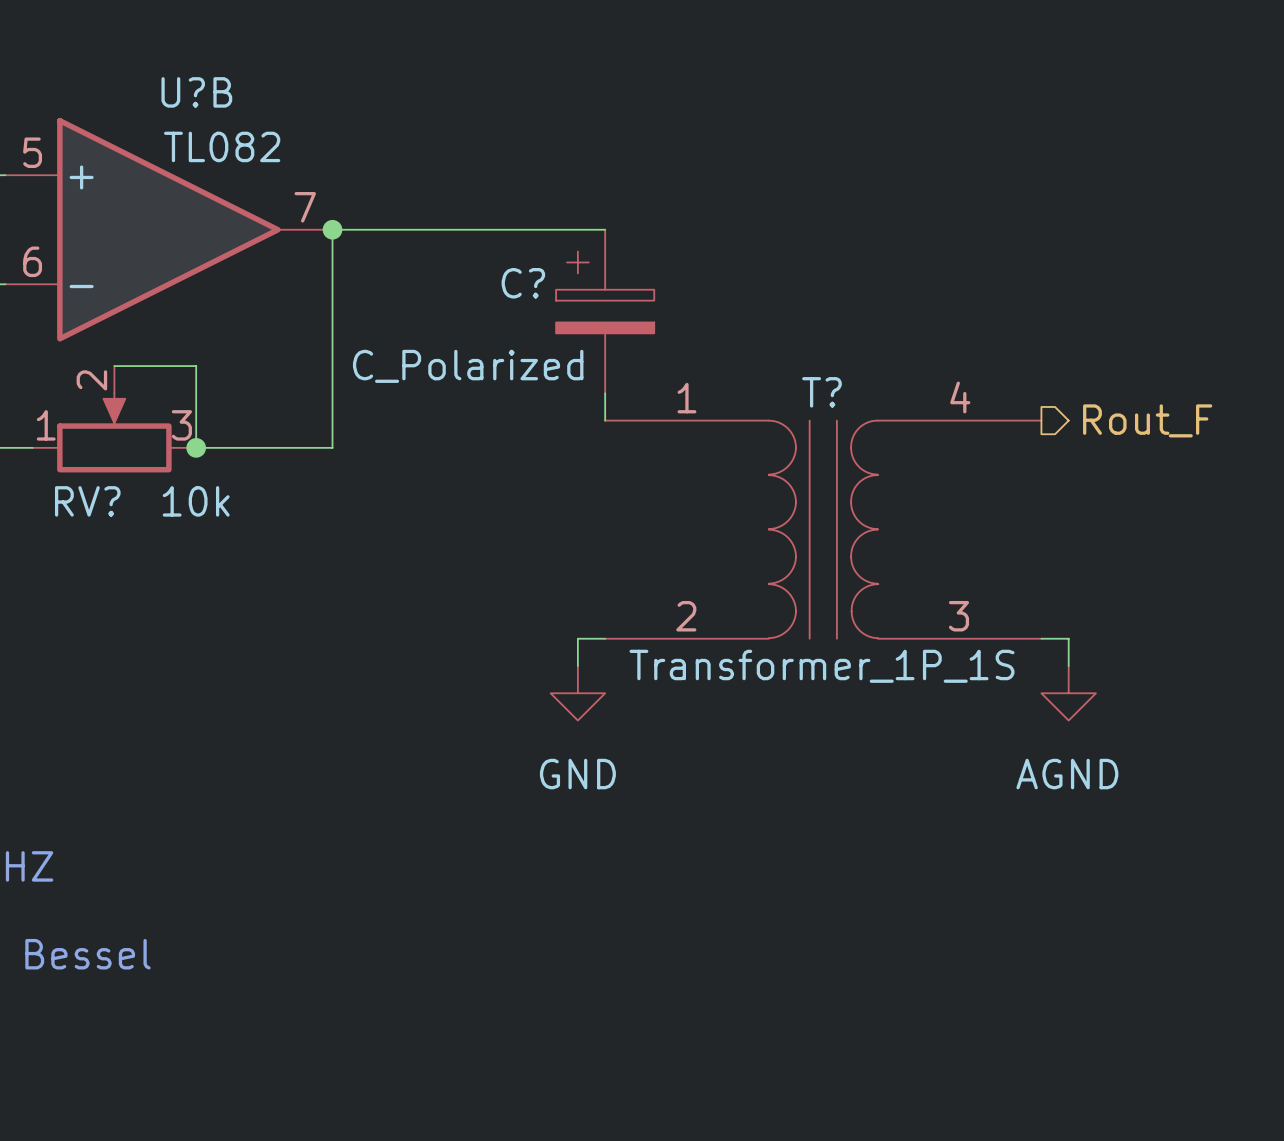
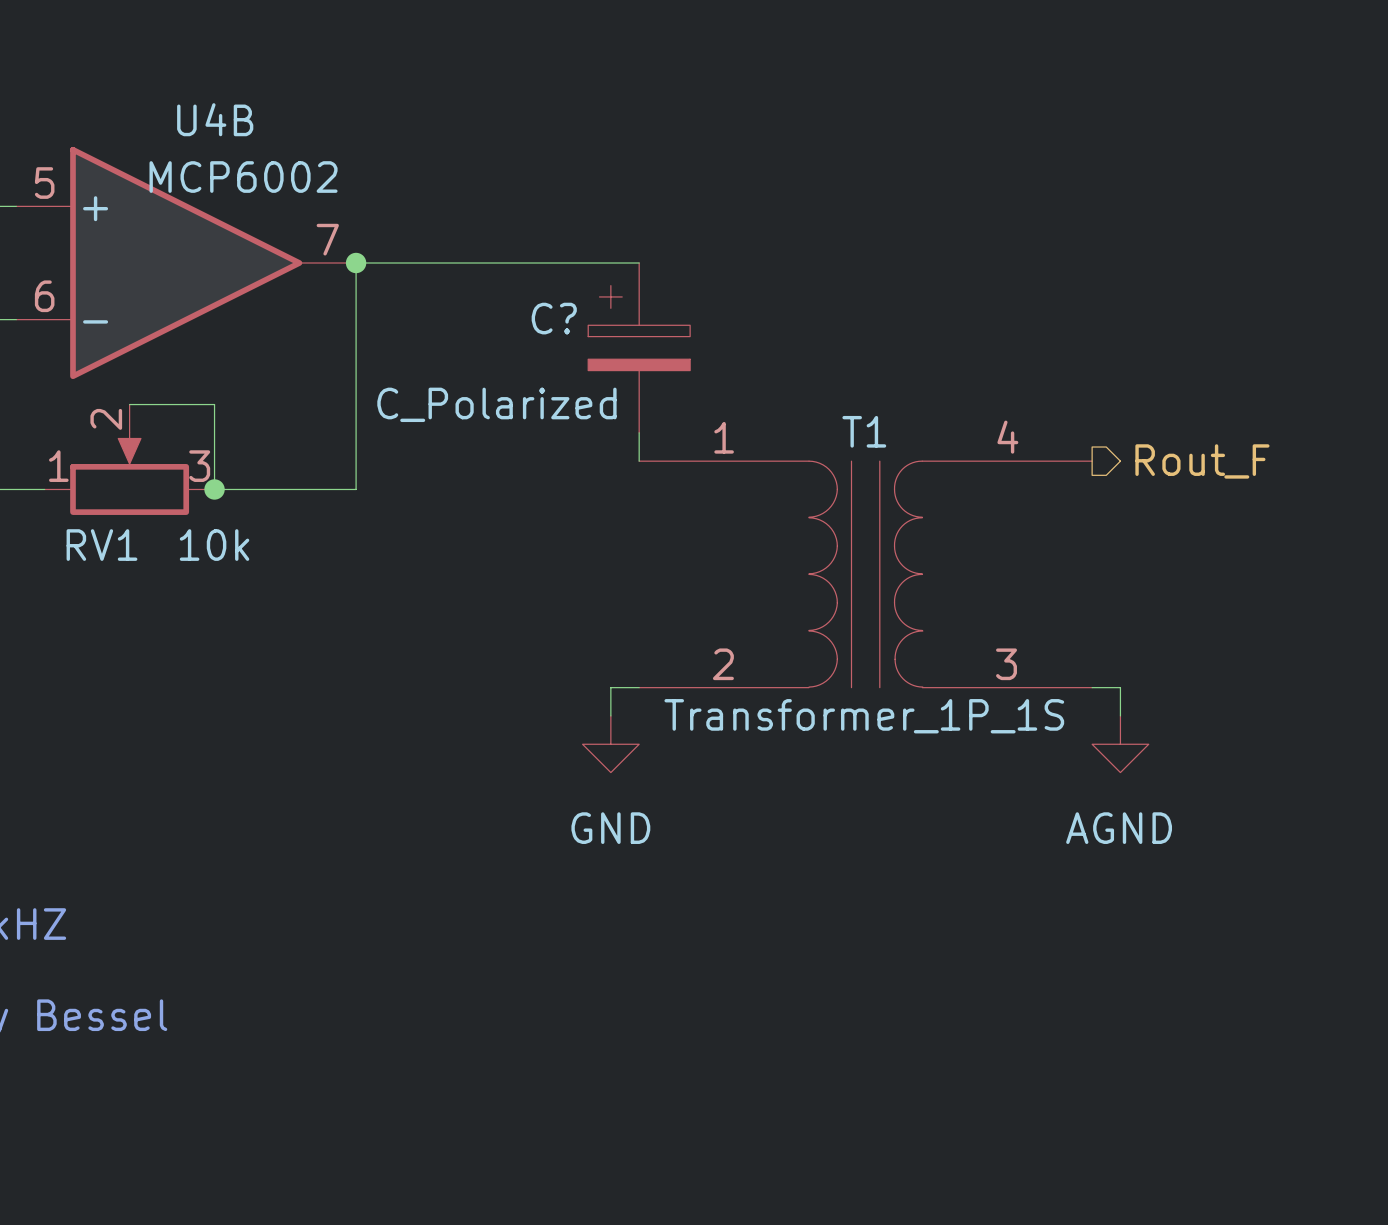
U?B name: U?B (196, 92) -> U4B (215, 119)
U?B value: TL082 (222, 146) -> MCP6002 (243, 177)
T? name: T? (821, 392) -> T1 (864, 431)
RV? name: RV? (87, 501) -> RV1 (101, 545)

